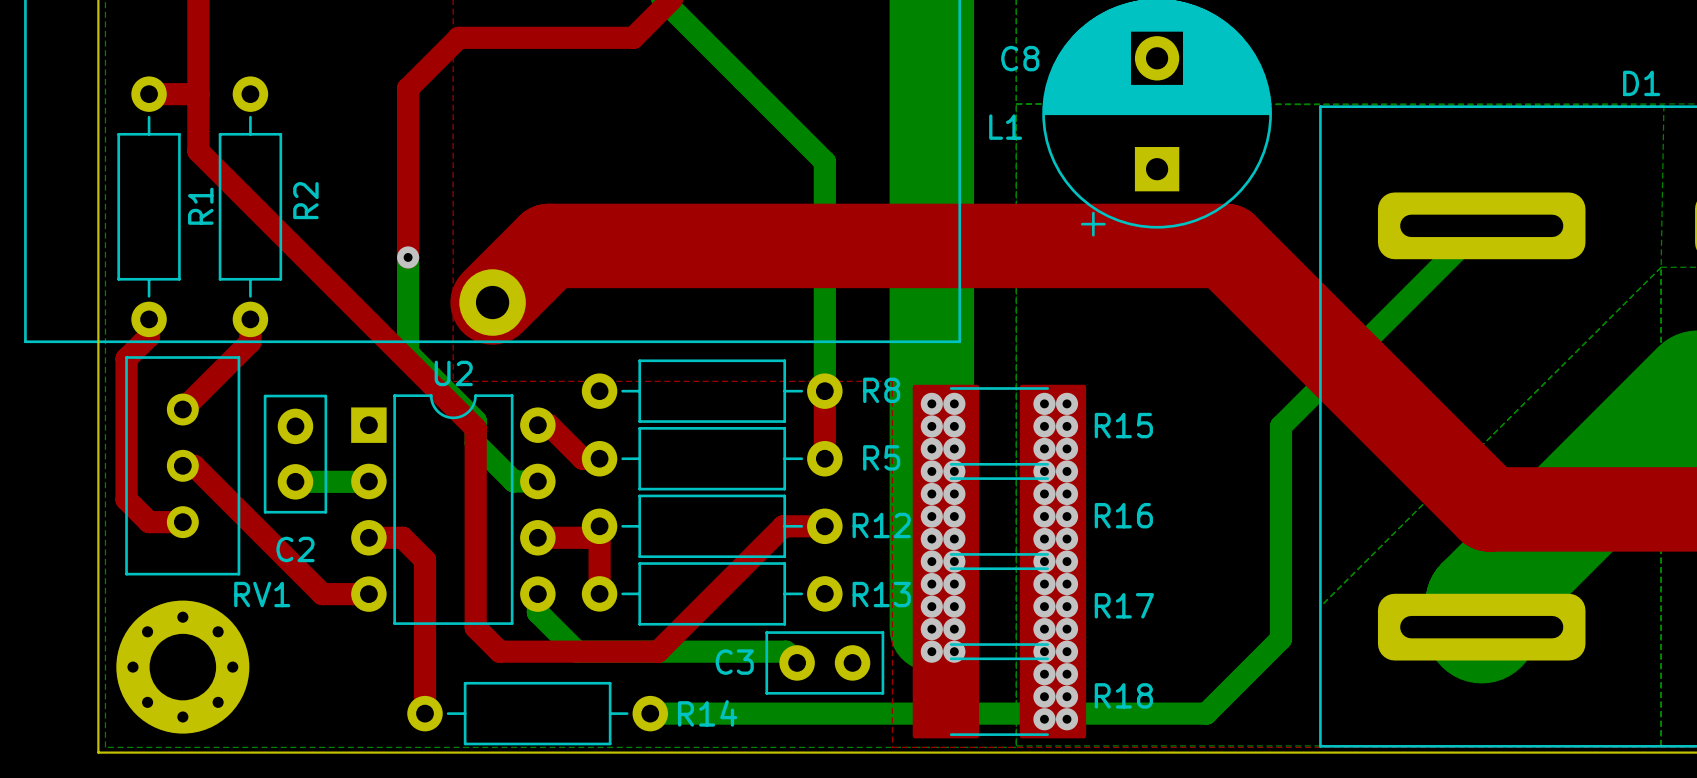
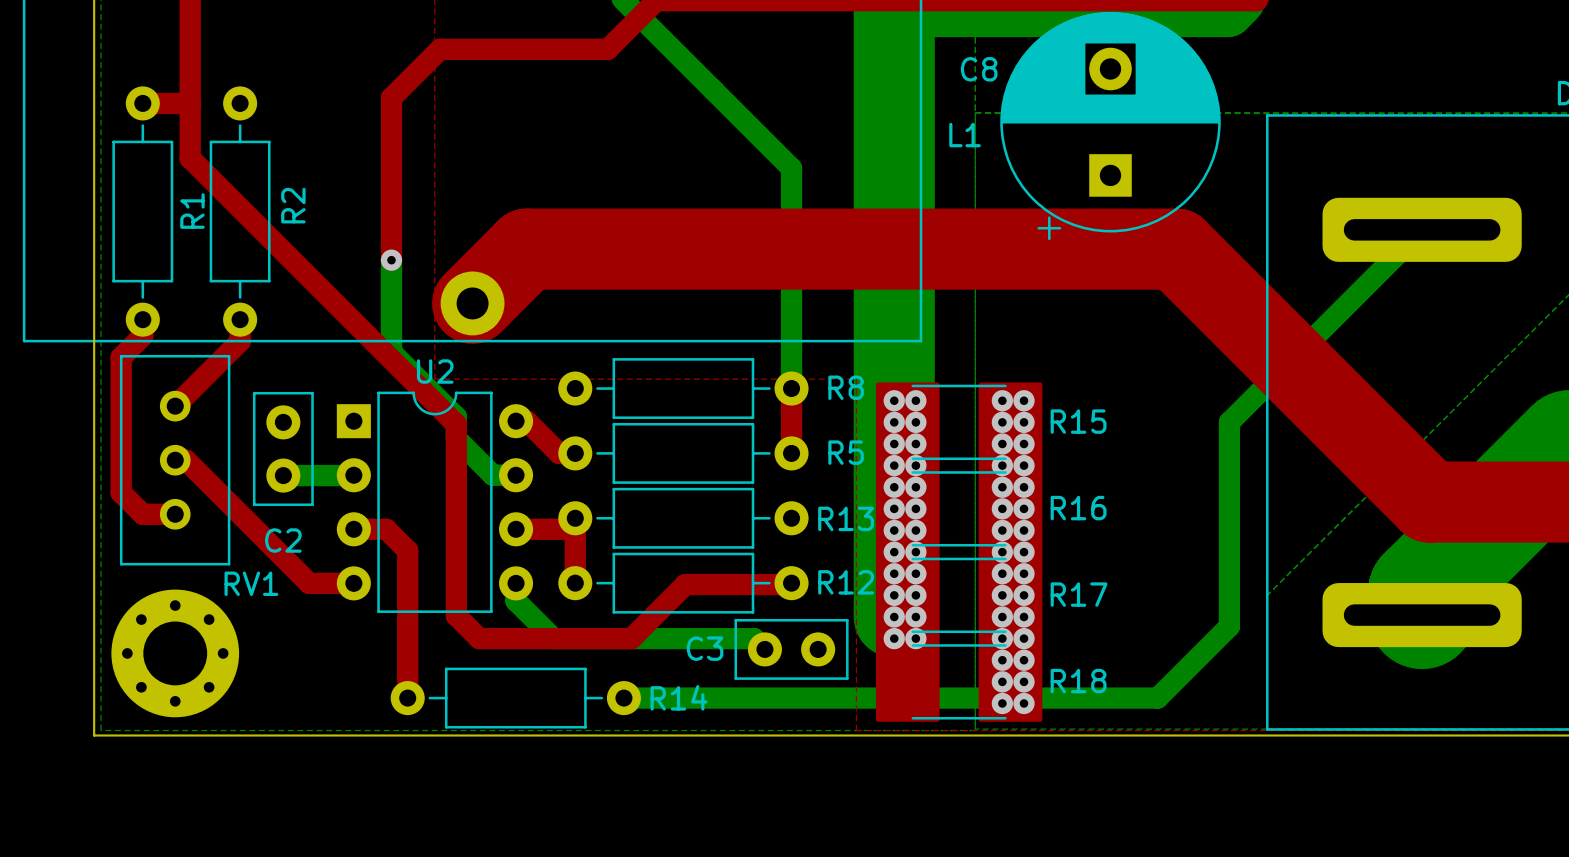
R12 name: R12 (881, 525) -> R13 (846, 518)
top track: (824, 526) (783, 526) (714, 595) -> (790, 584) (685, 584)
R13 name: R13 (881, 594) -> R12 (846, 582)

